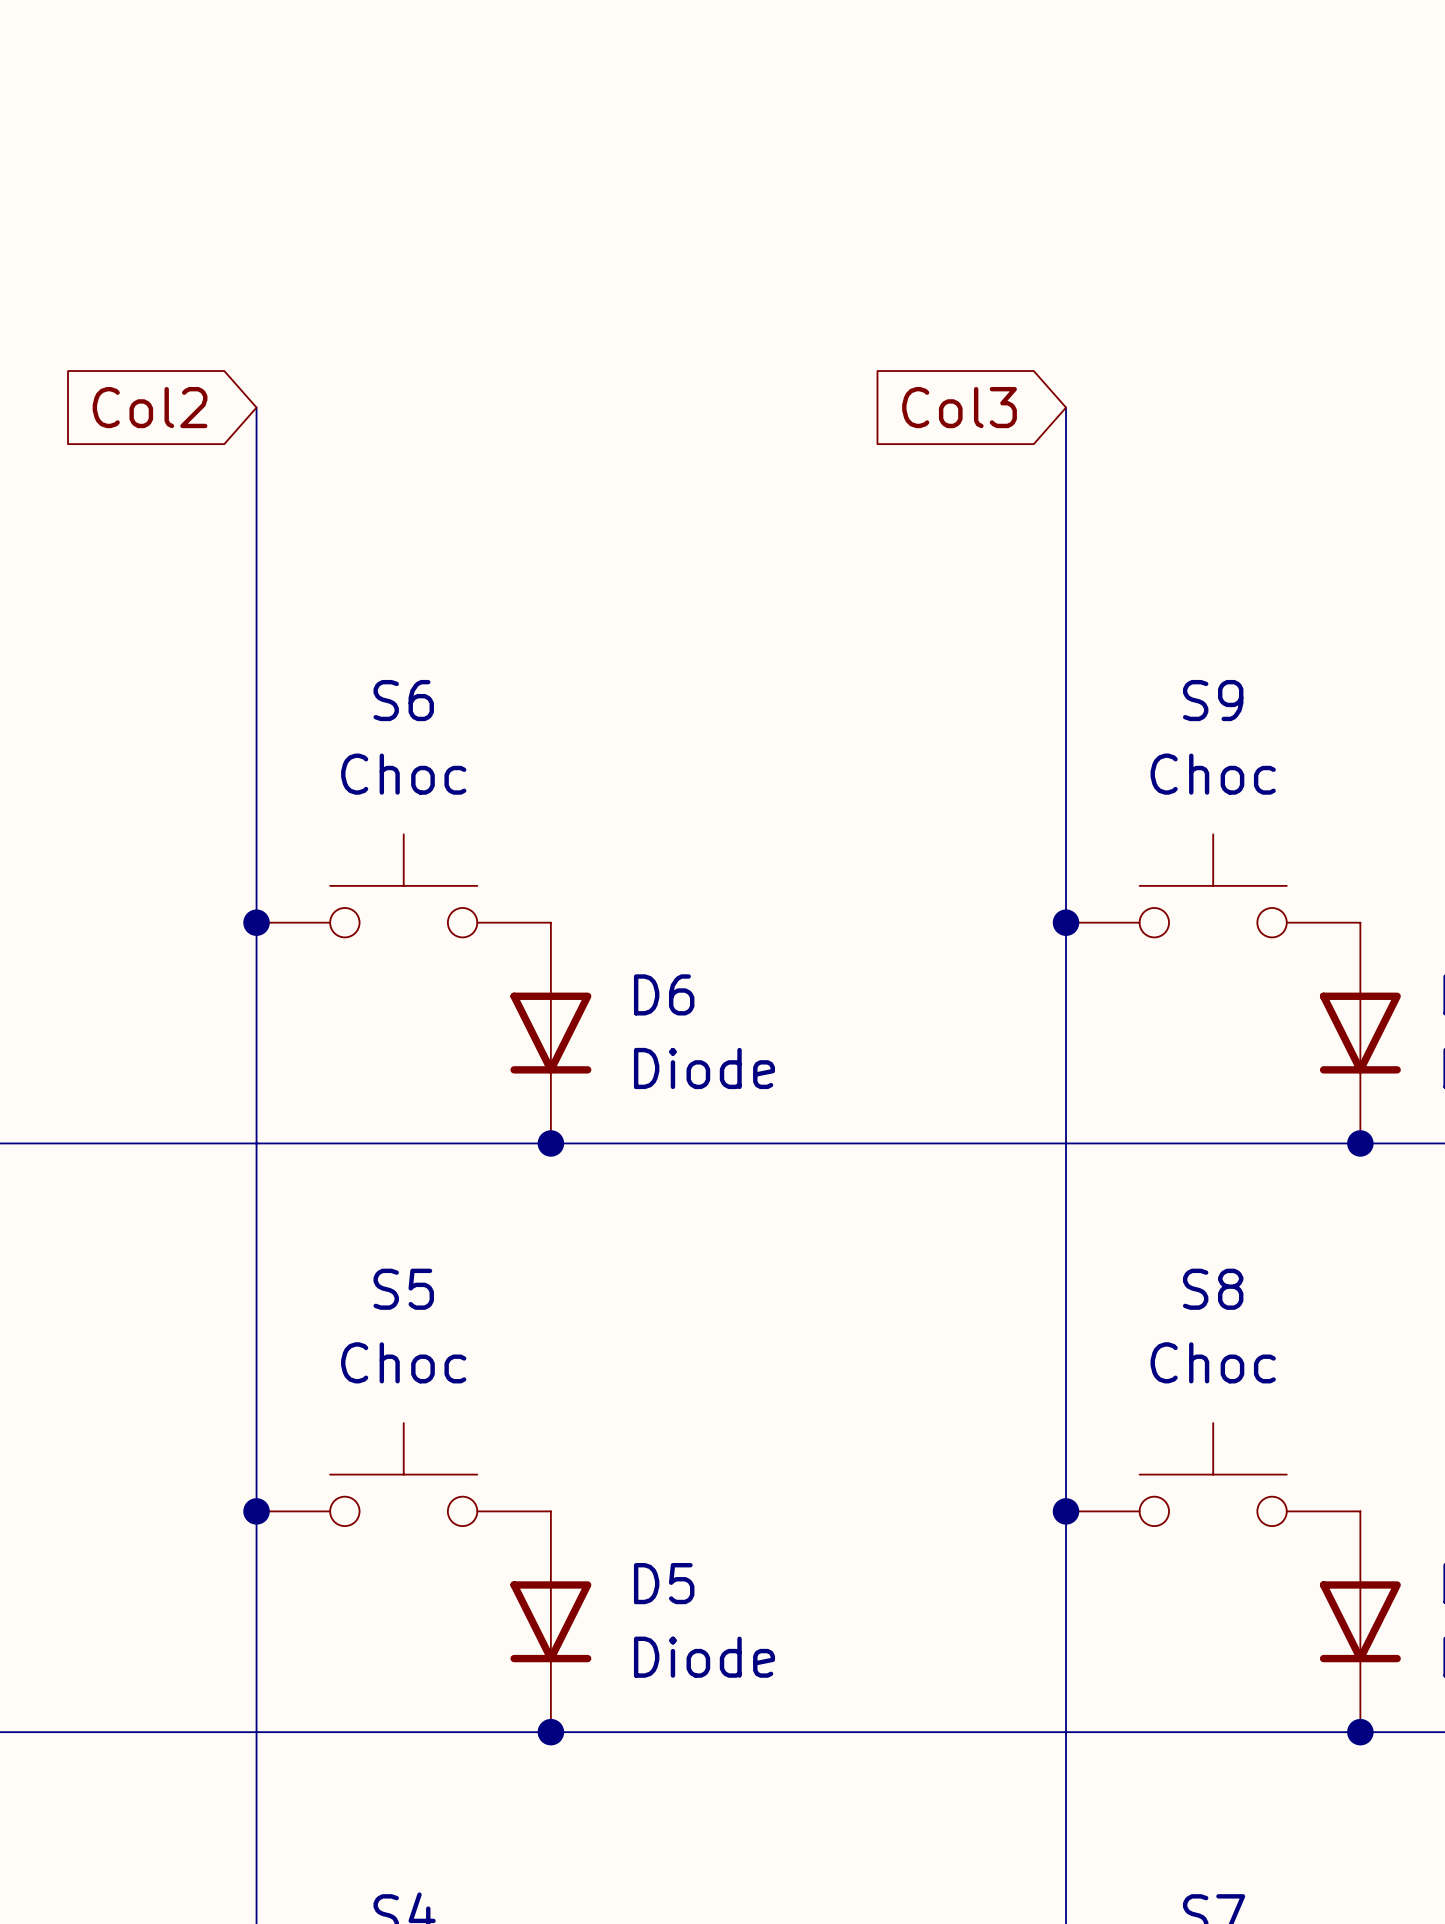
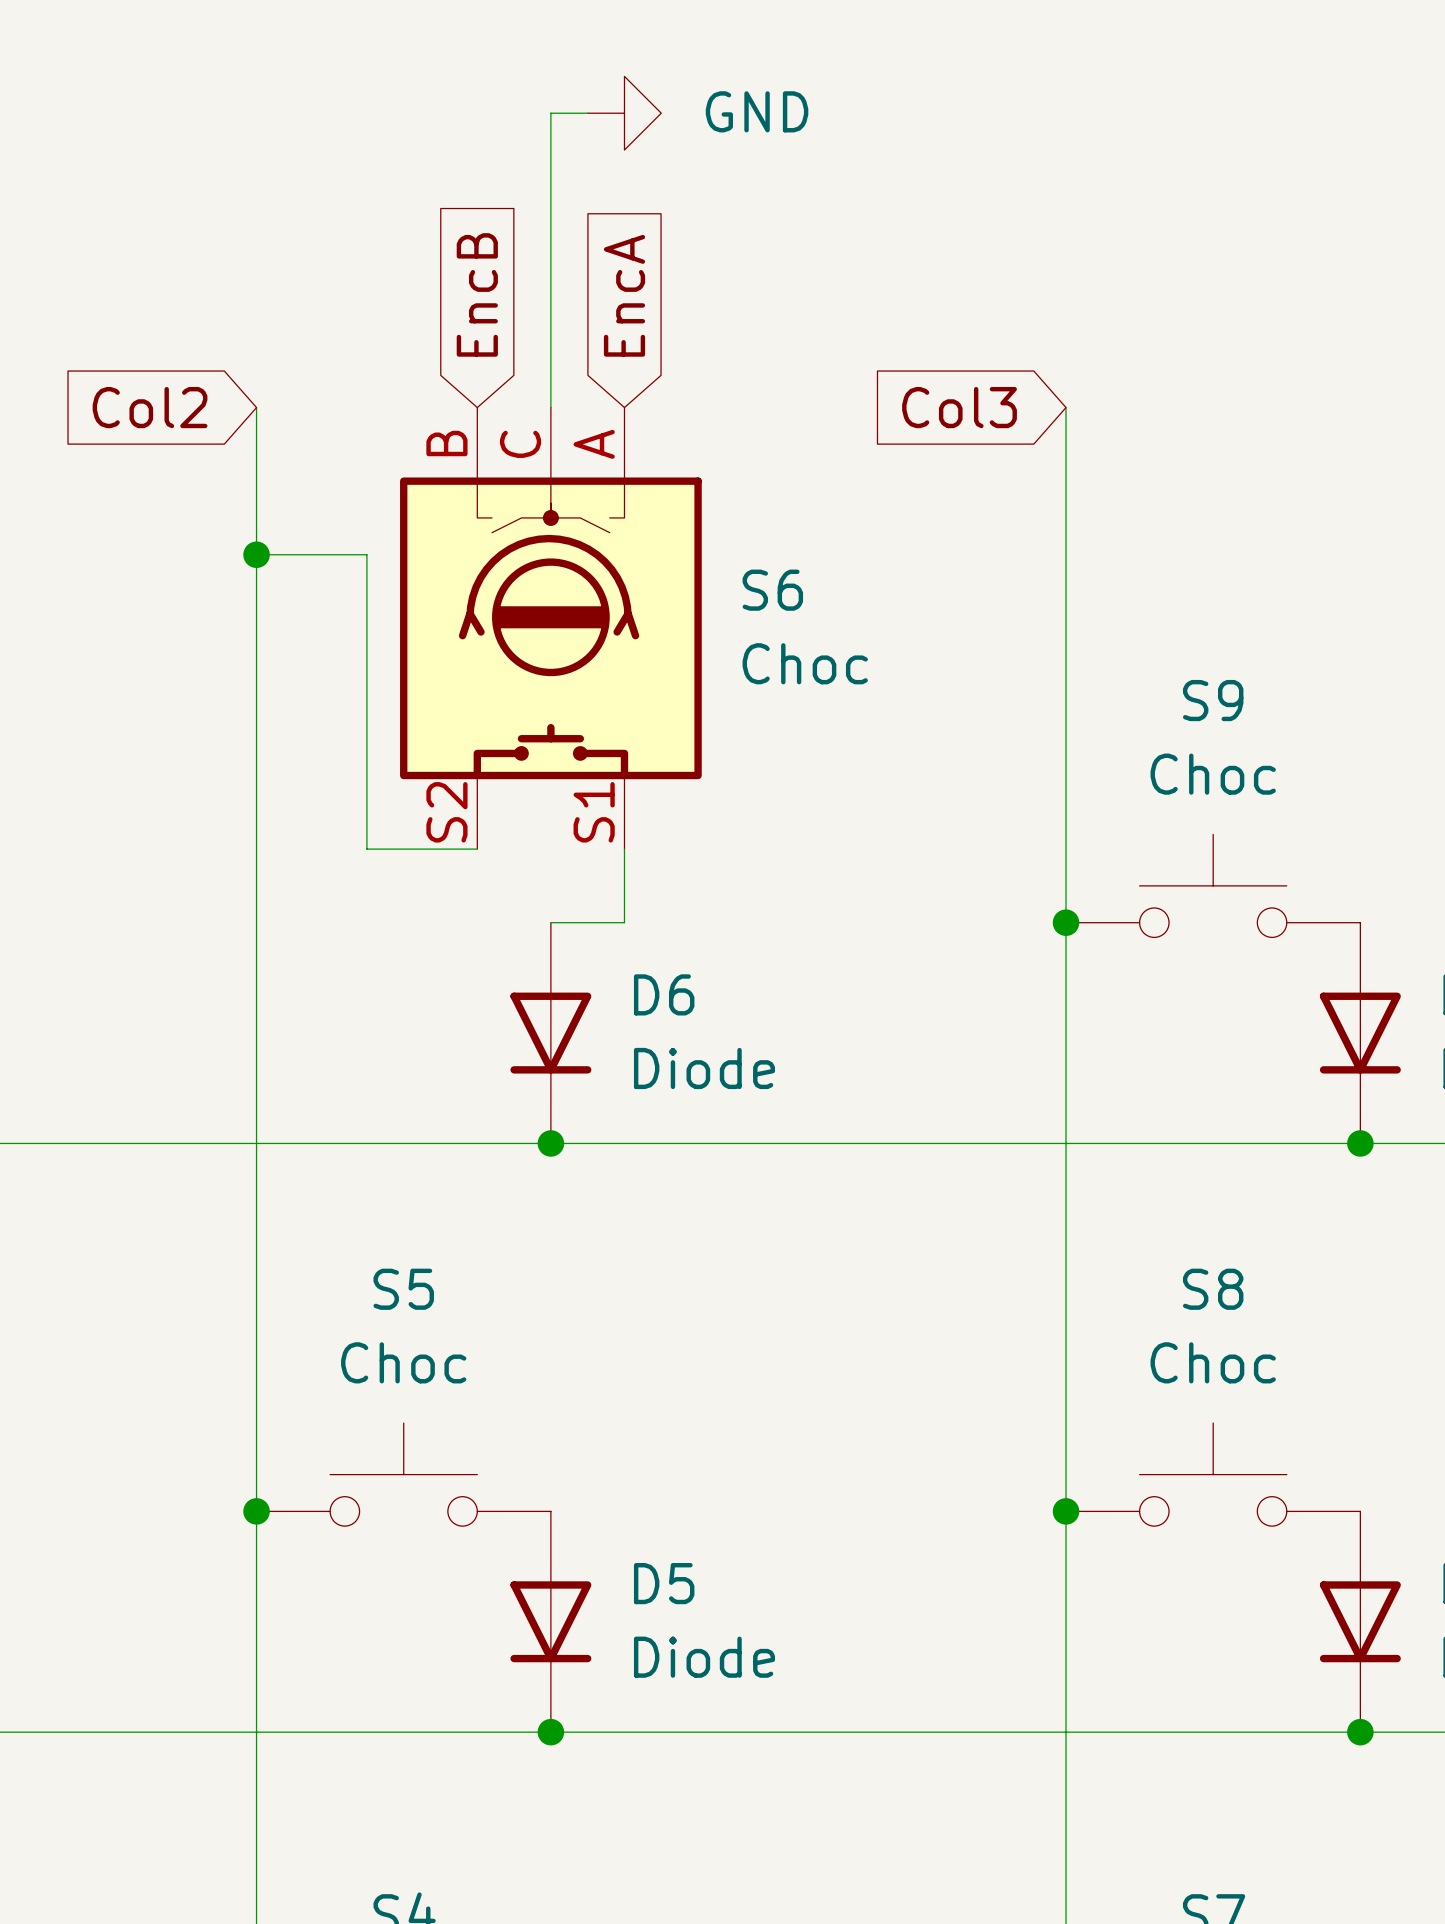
wire: none -> (587, 113) (550, 113) (550, 407)
power symbol: none -> GND (624, 113)
global label: none -> EncB (477, 294)
global label: none -> EncA (624, 295)
wire: none -> (256, 554) (366, 554) (366, 849) (477, 849)
junction: none -> (256, 554)
S6 name position: S6 (403, 700) -> S6 (772, 590)
S6 value position: Choc (403, 774) -> Choc (805, 663)
S6 symbol: [256, 834, 551, 938] -> [400, 407, 702, 850]
wire: none -> (624, 849) (624, 922) (550, 922)
junction: (256, 922) -> none

